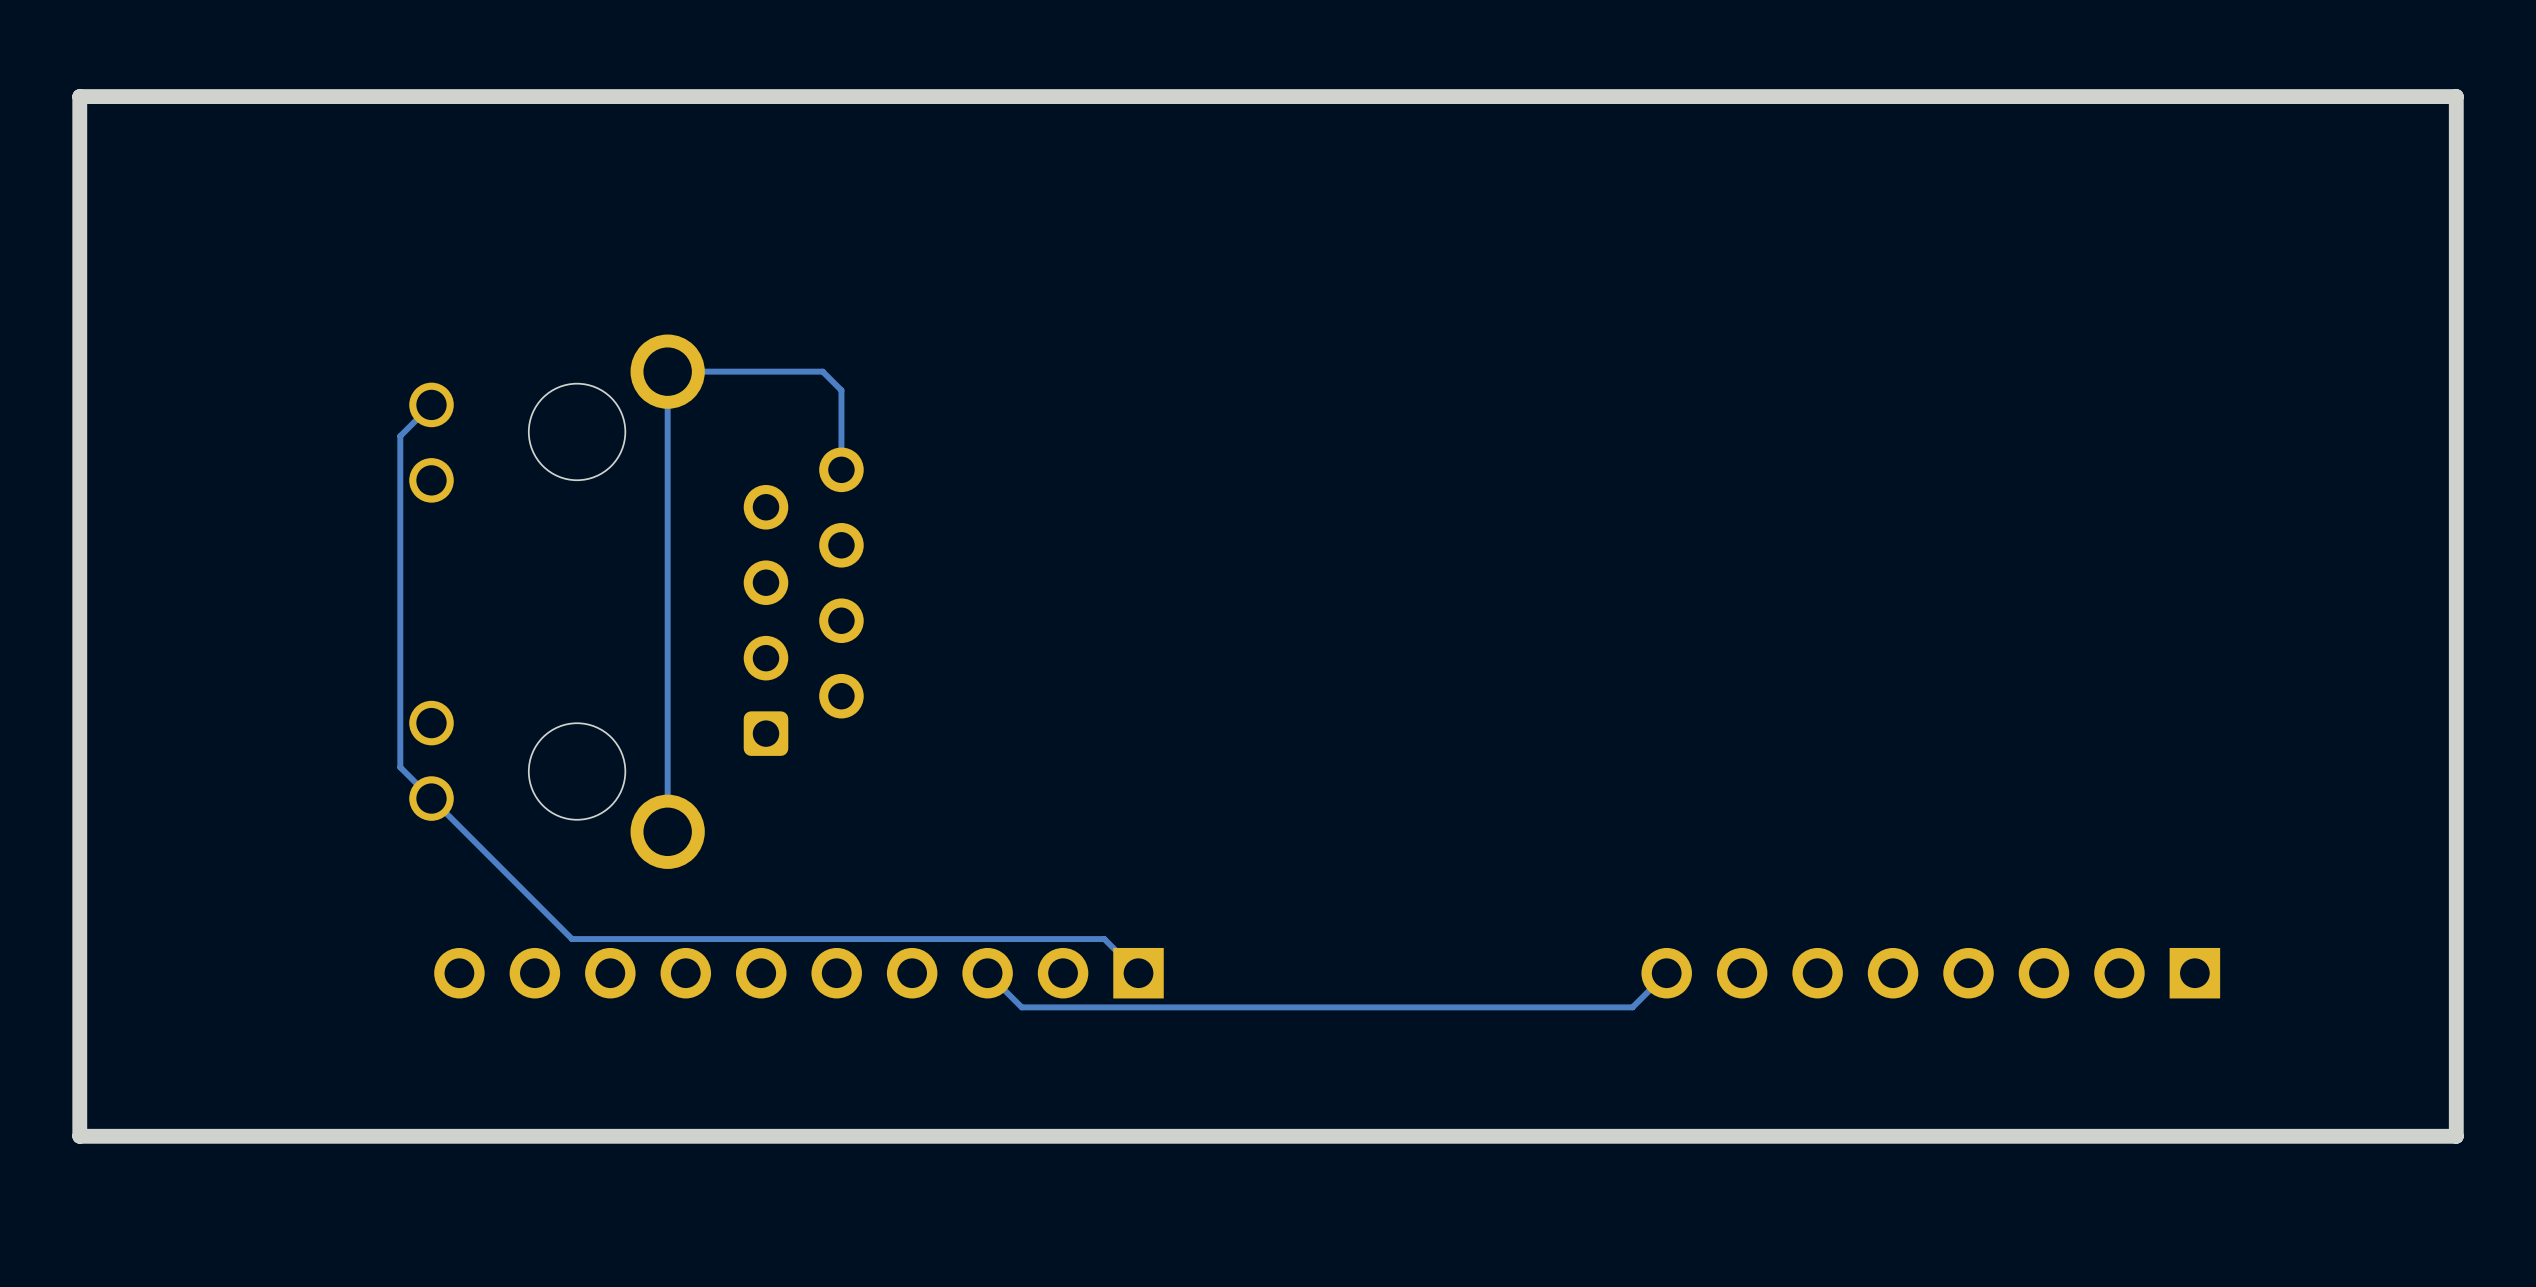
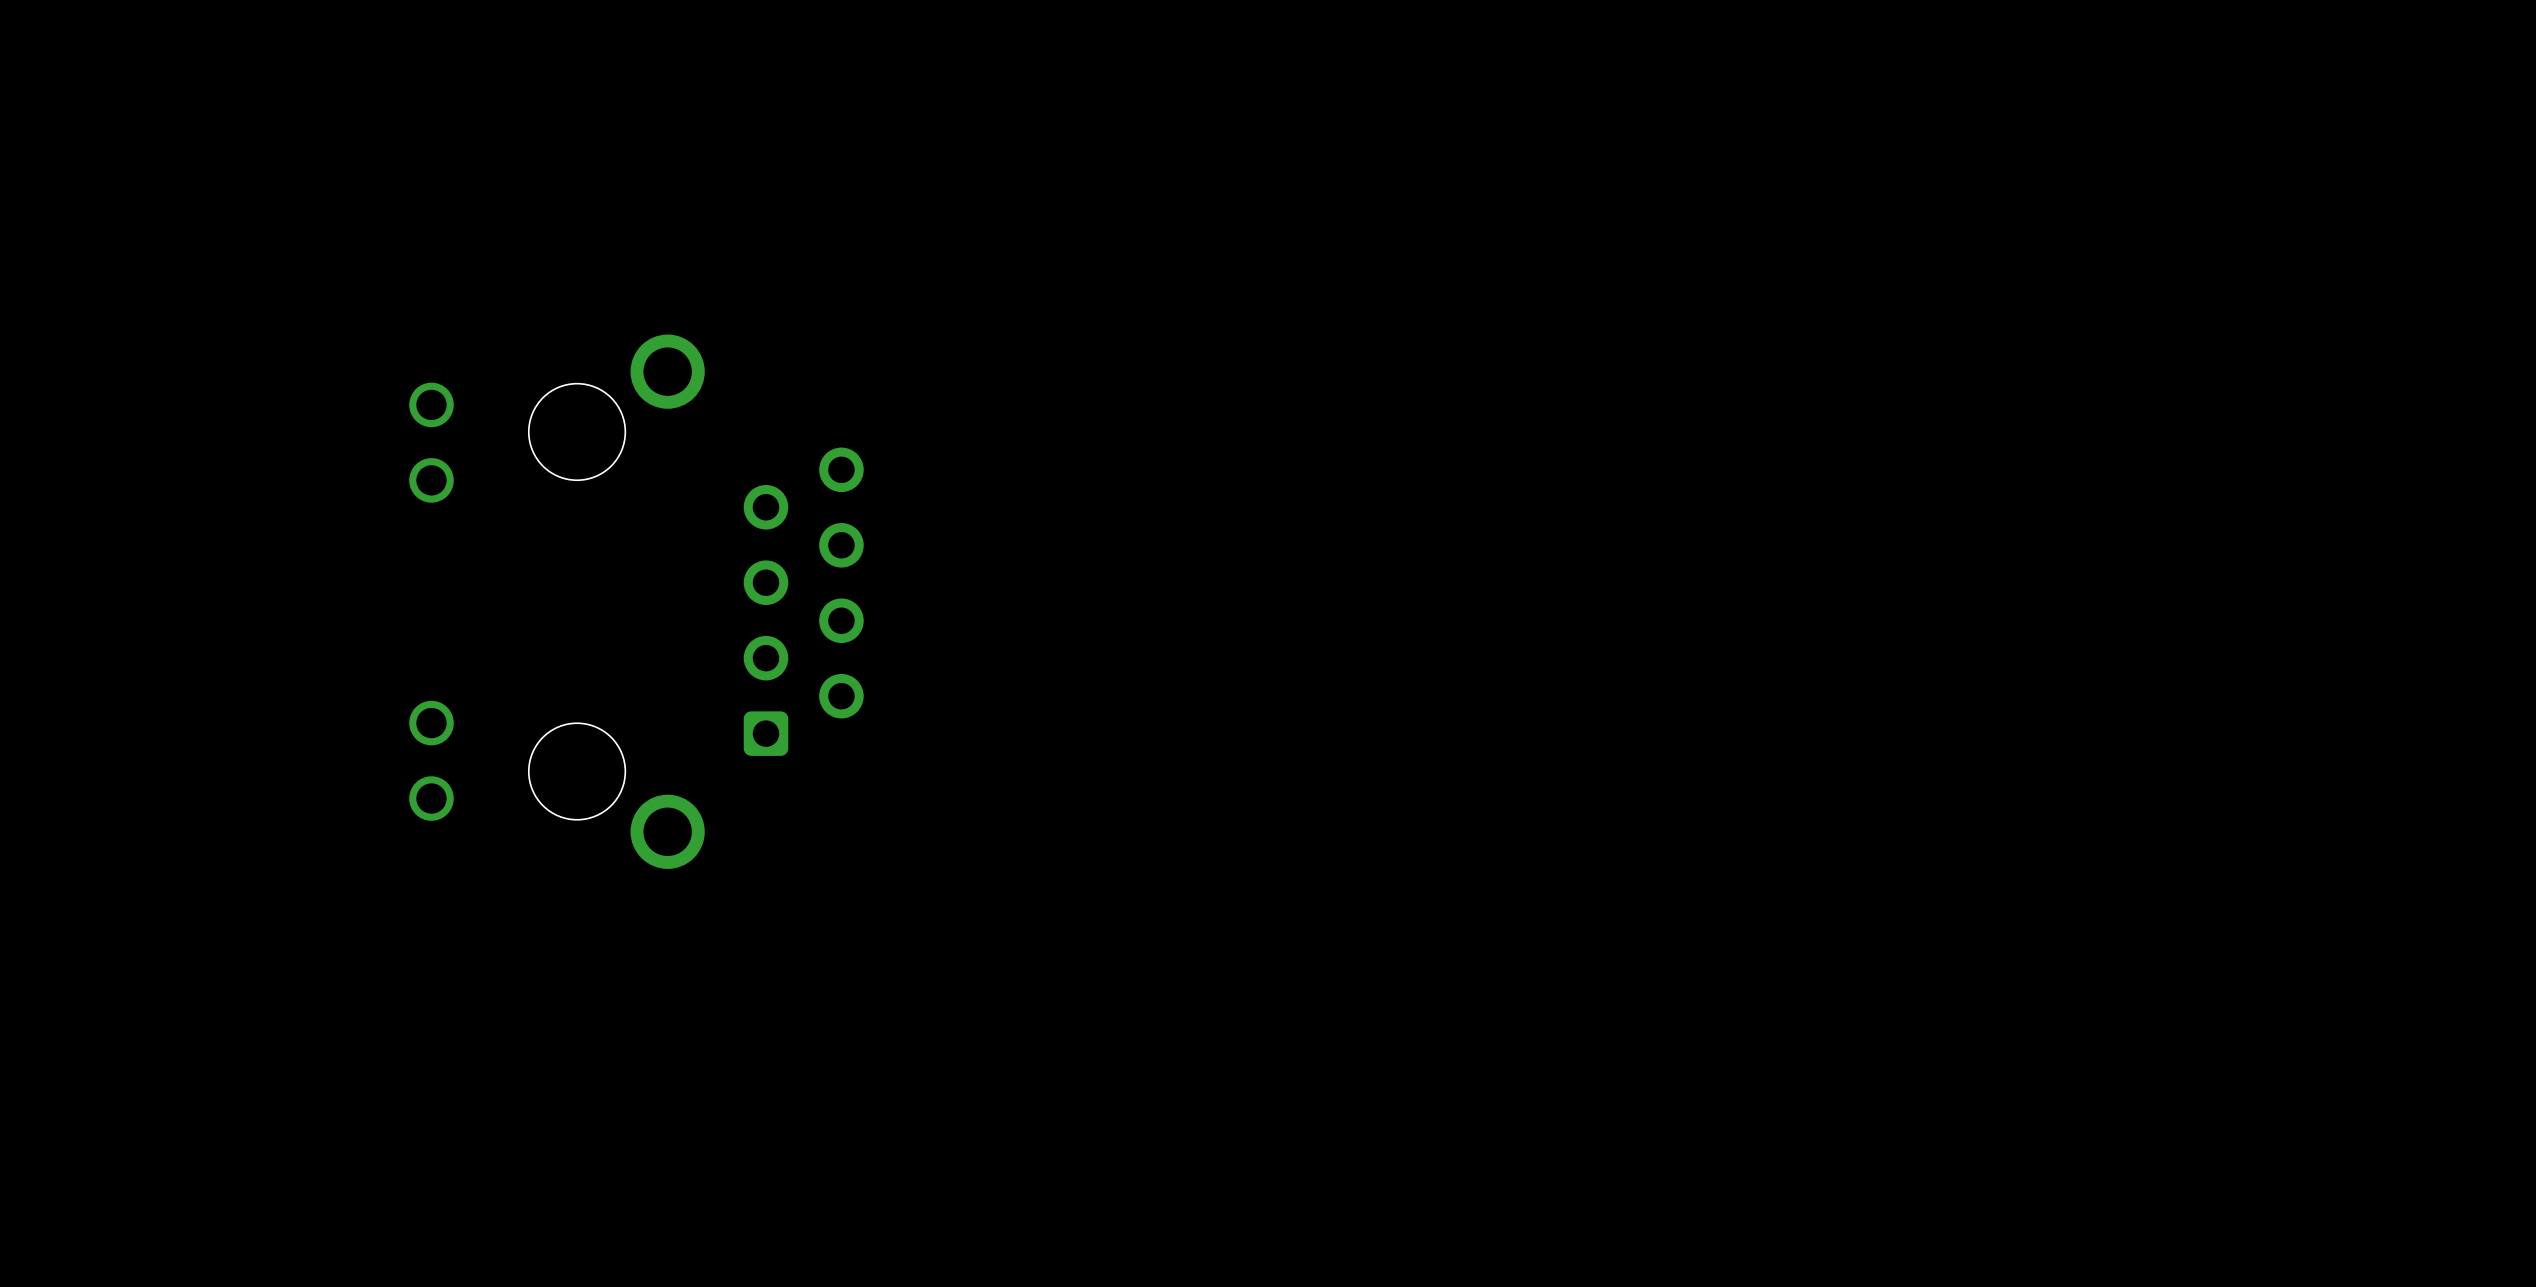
board edge: (2456, 96) (79, 96) (79, 1136) (2456, 1136) (2456, 96) -> none
track: (431, 404) (400, 436) (400, 767) (572, 939) (1104, 939) (1138, 973) -> none
track: (841, 469) (841, 390) (822, 371) (667, 371) (667, 831) -> none
part: (798, 973) -> none
track: (1666, 973) (1632, 1007) (1021, 1007) (987, 973) -> none
part: (1930, 973) -> none

